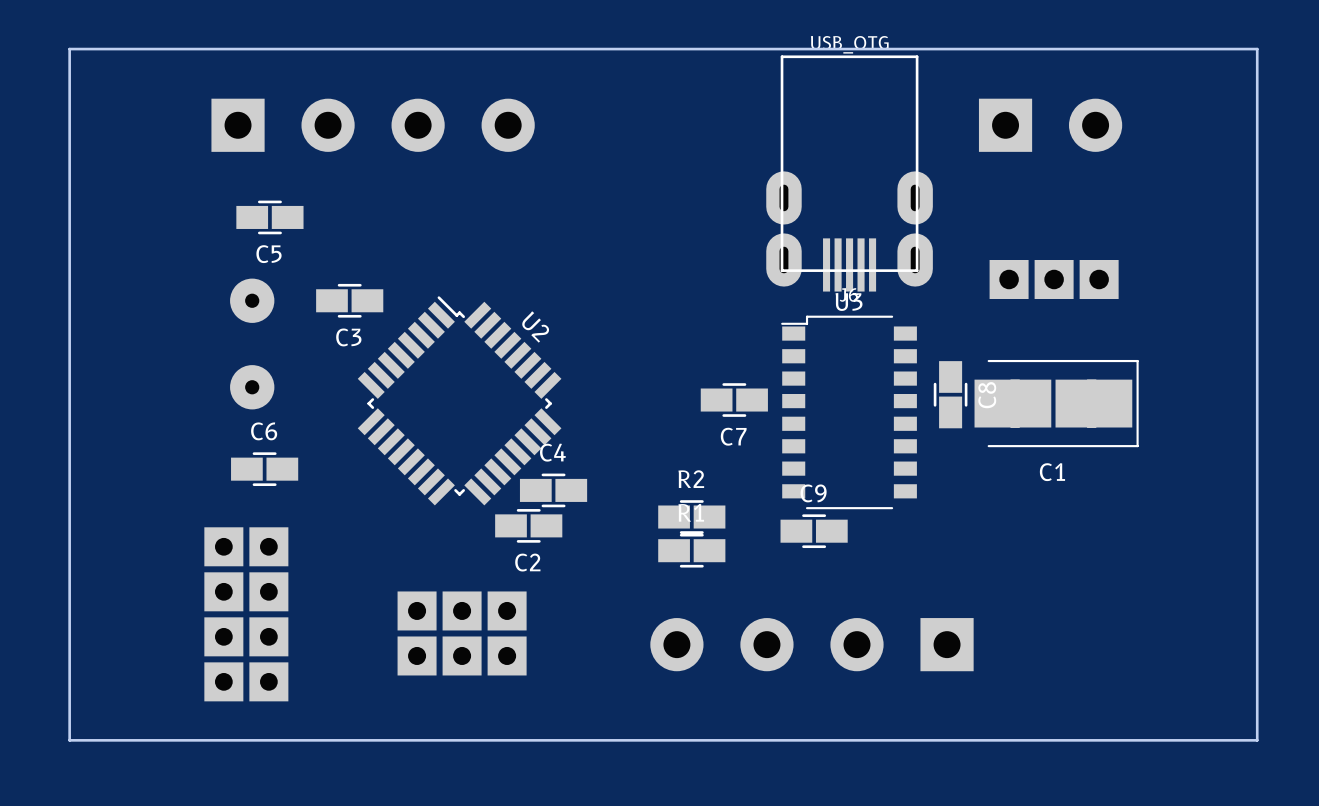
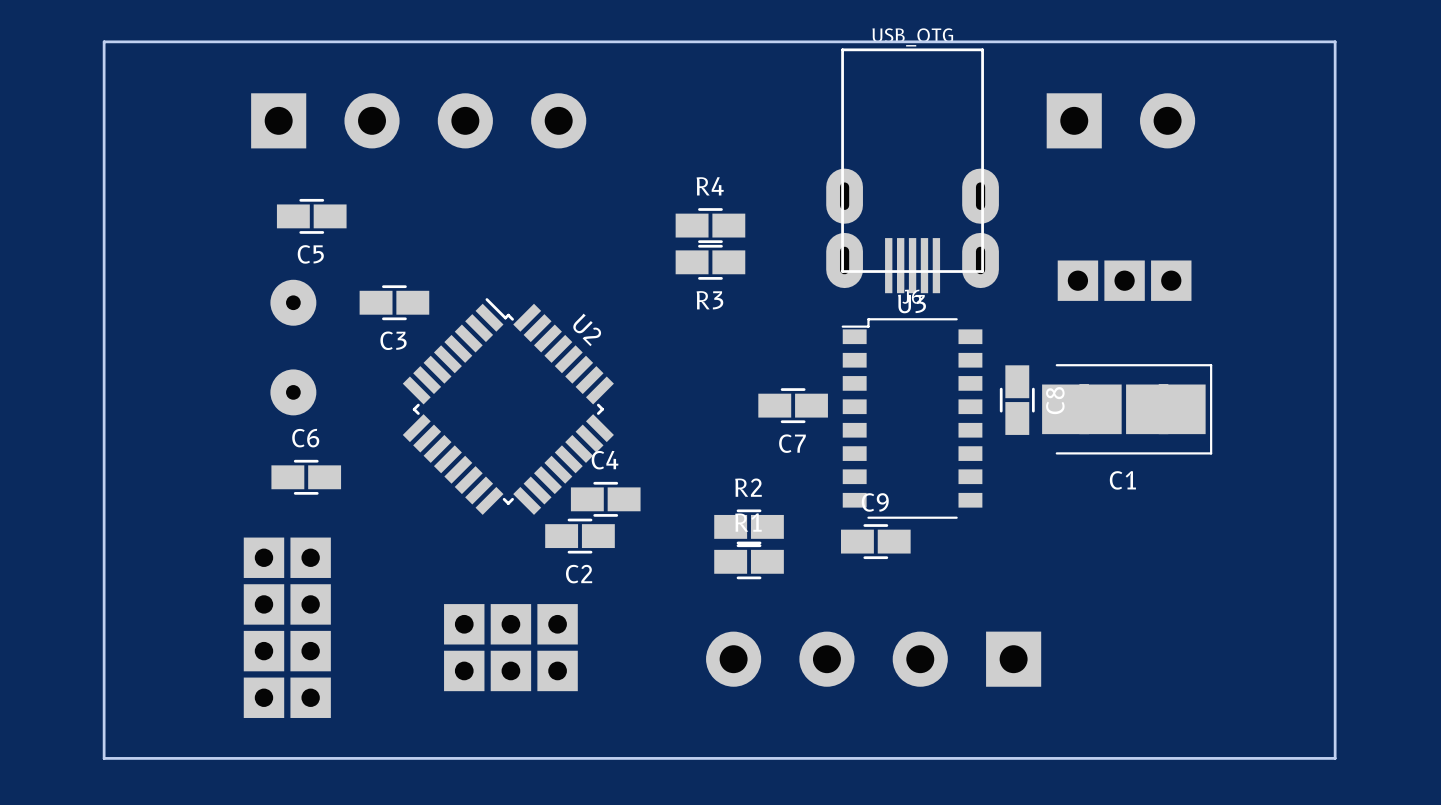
R4: none -> (710, 225)
R3: none -> (710, 262)

